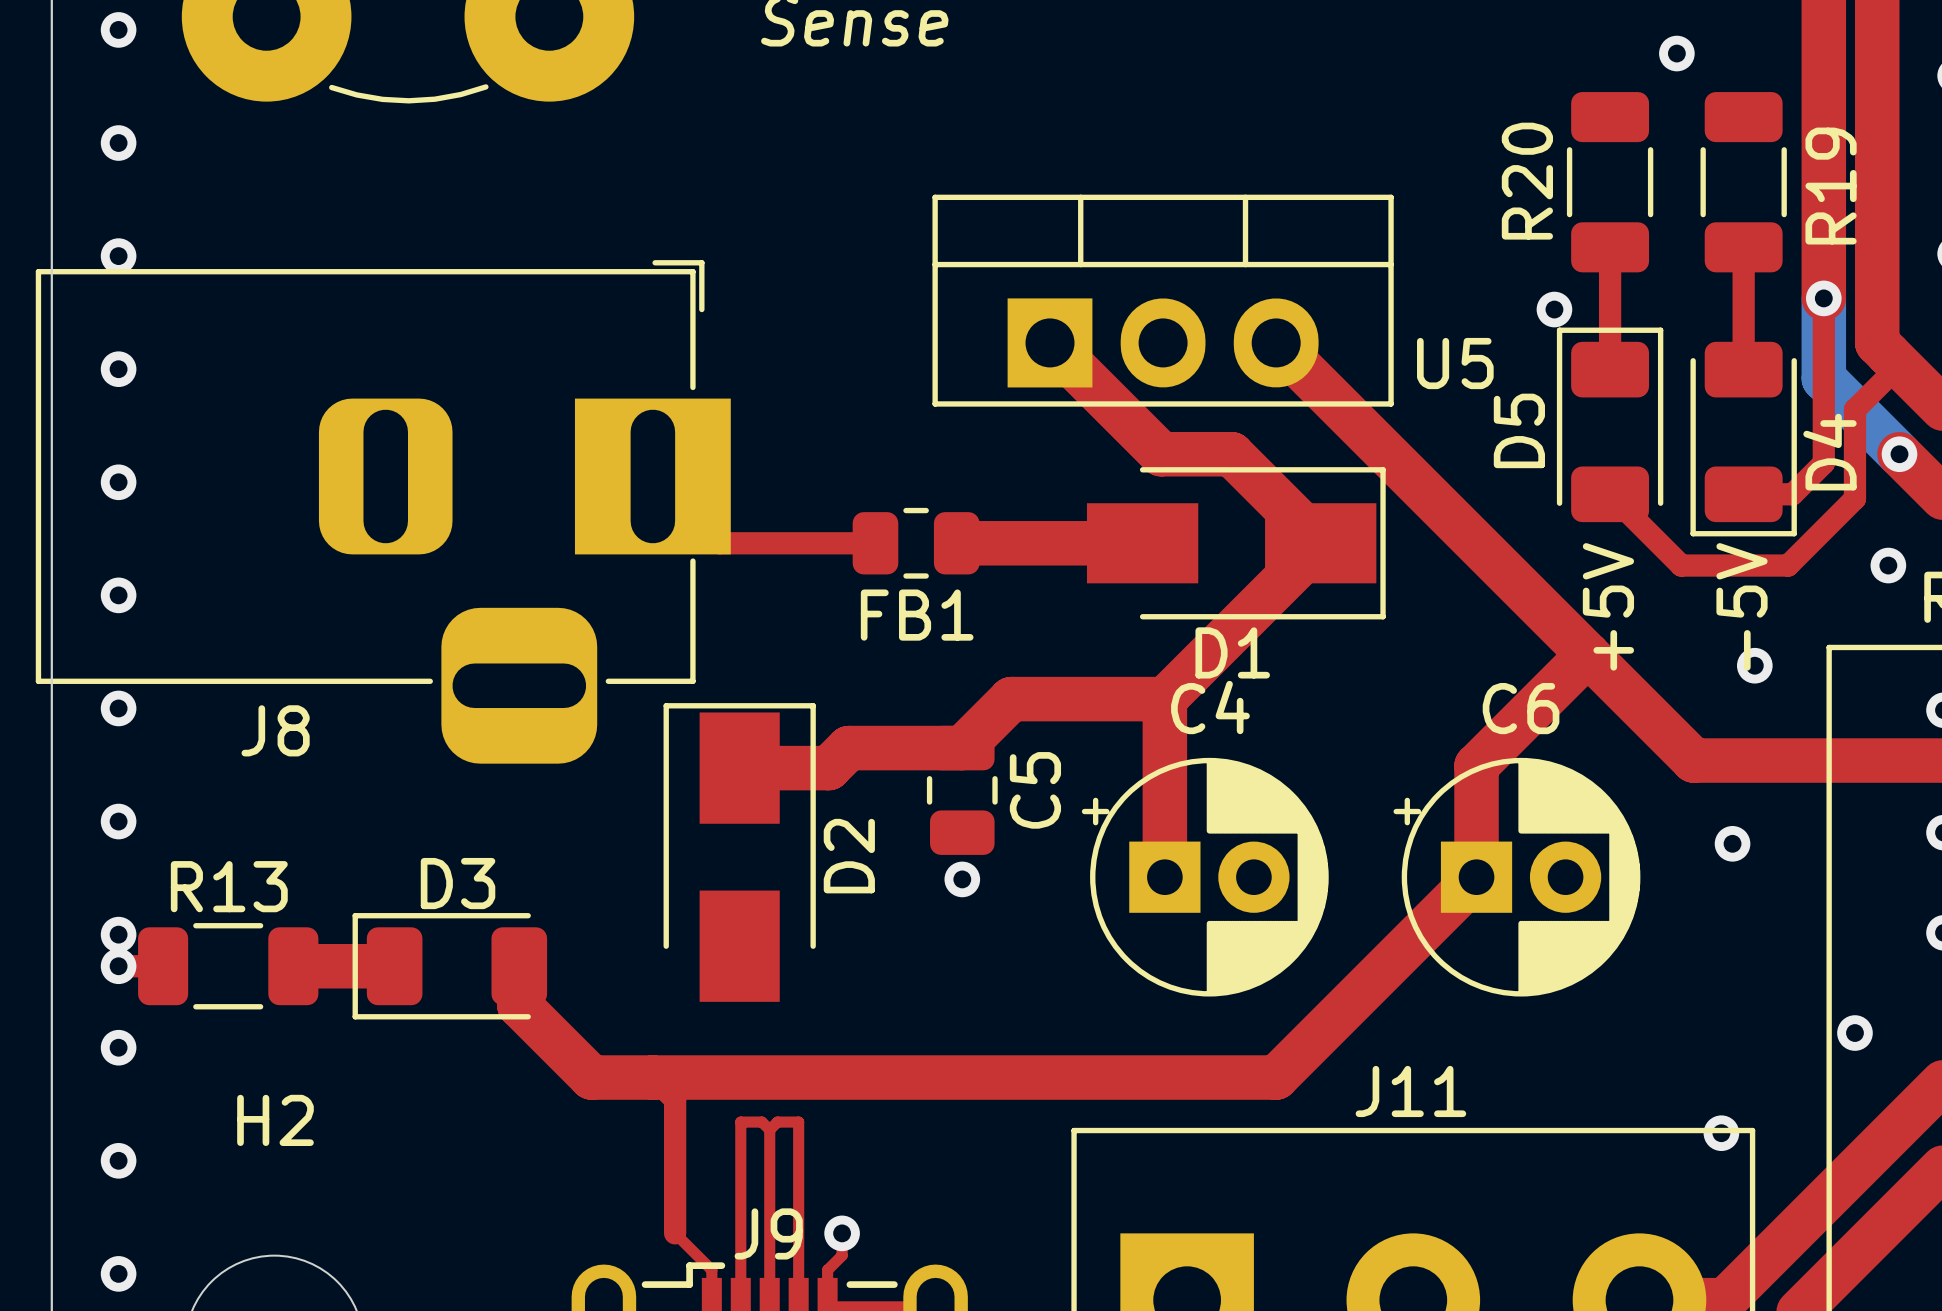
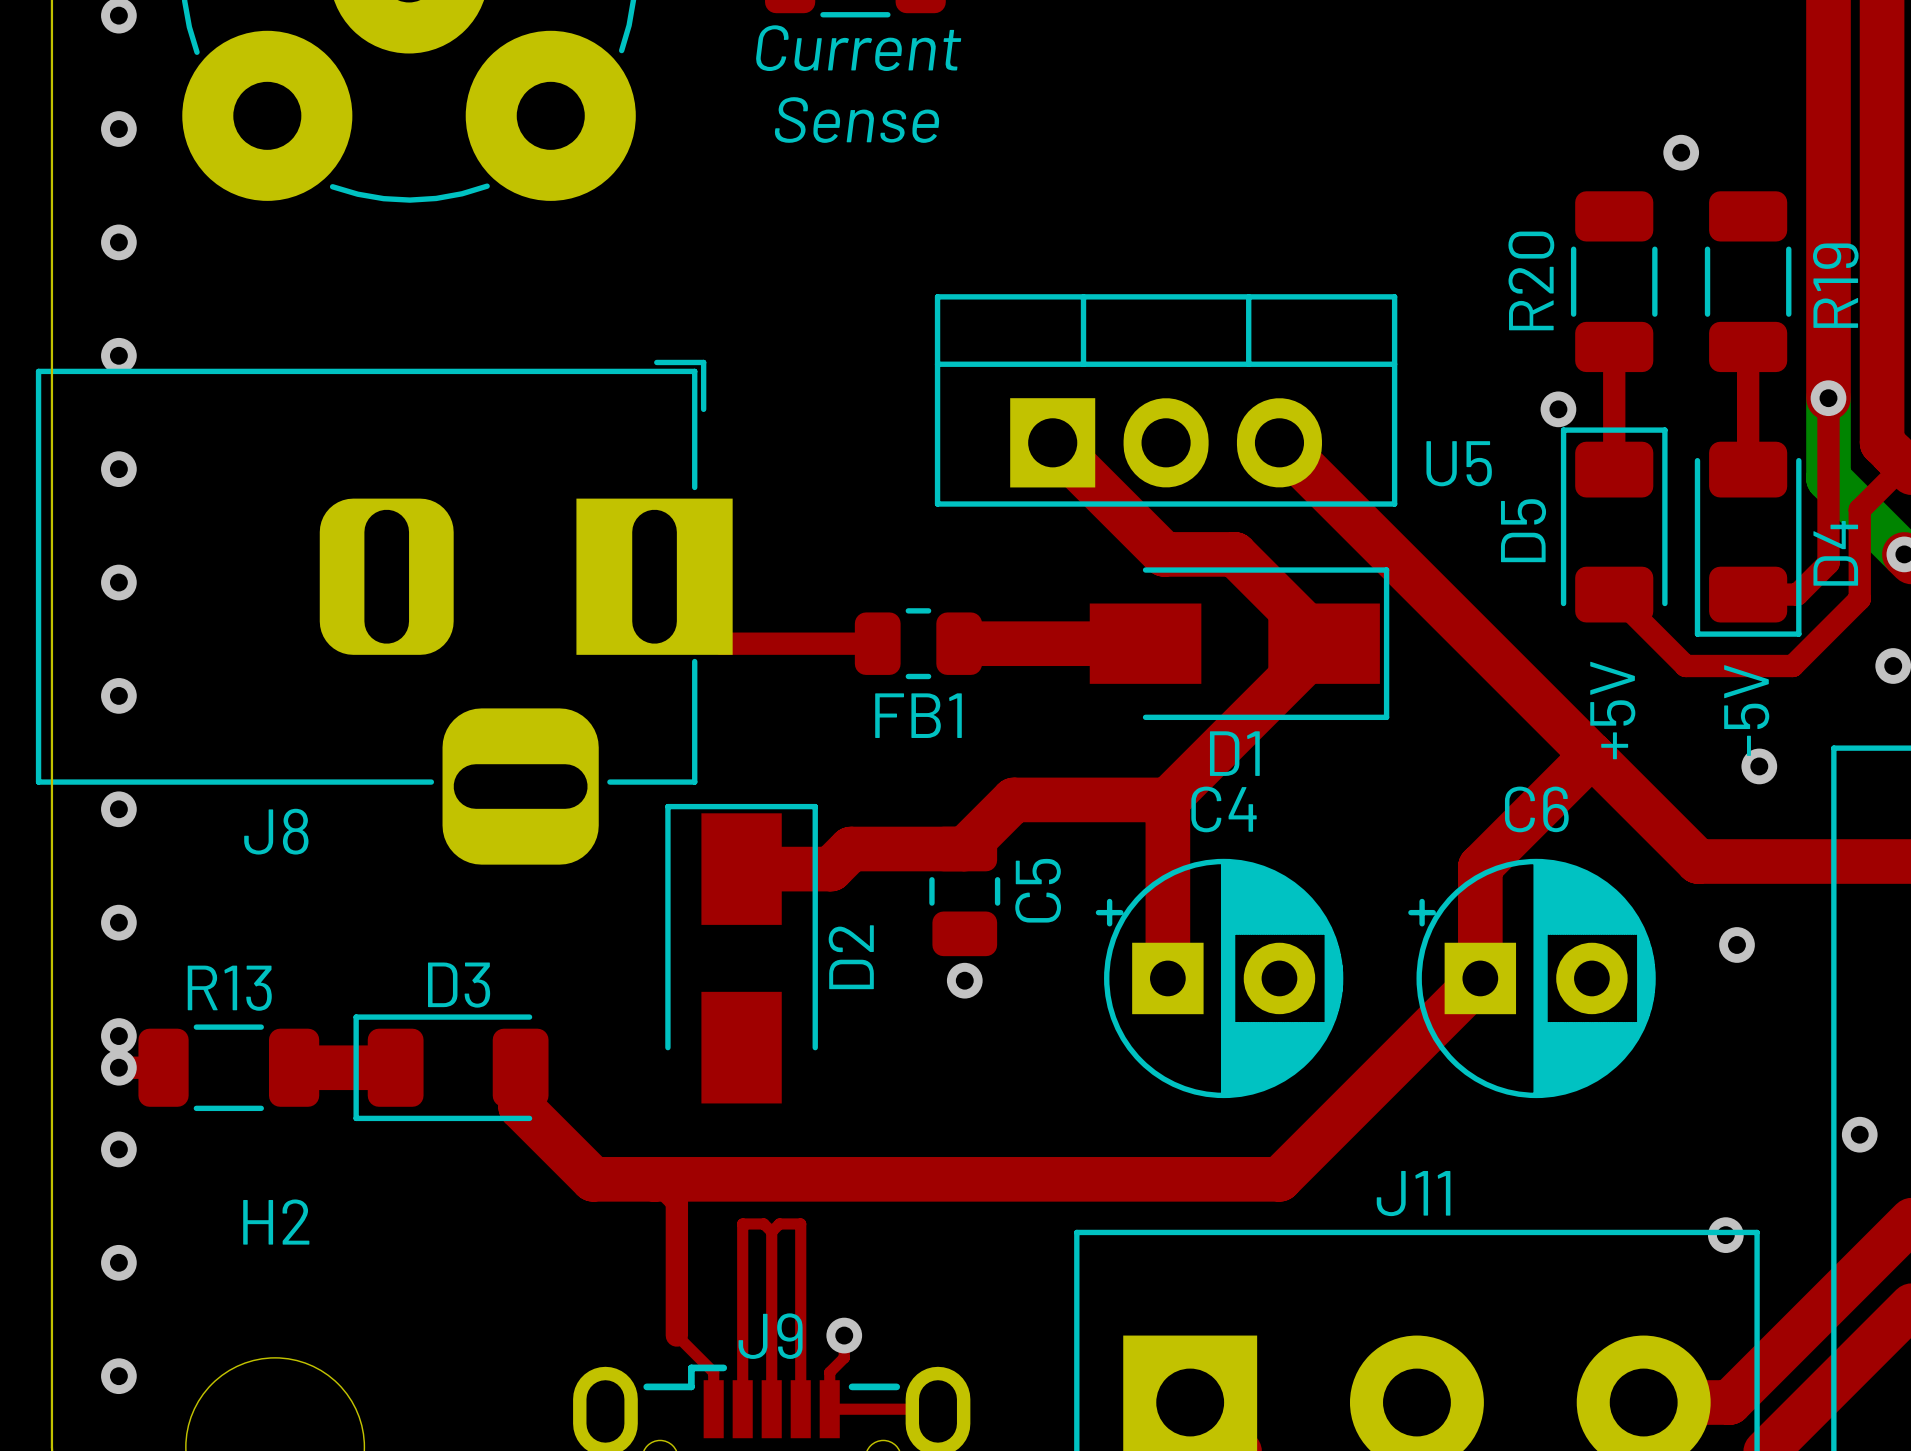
C4 footprint: [1081, 757, 1329, 997] -> [1095, 858, 1344, 1099]
C6 footprint: [1393, 757, 1641, 997] -> [1408, 858, 1656, 1099]

